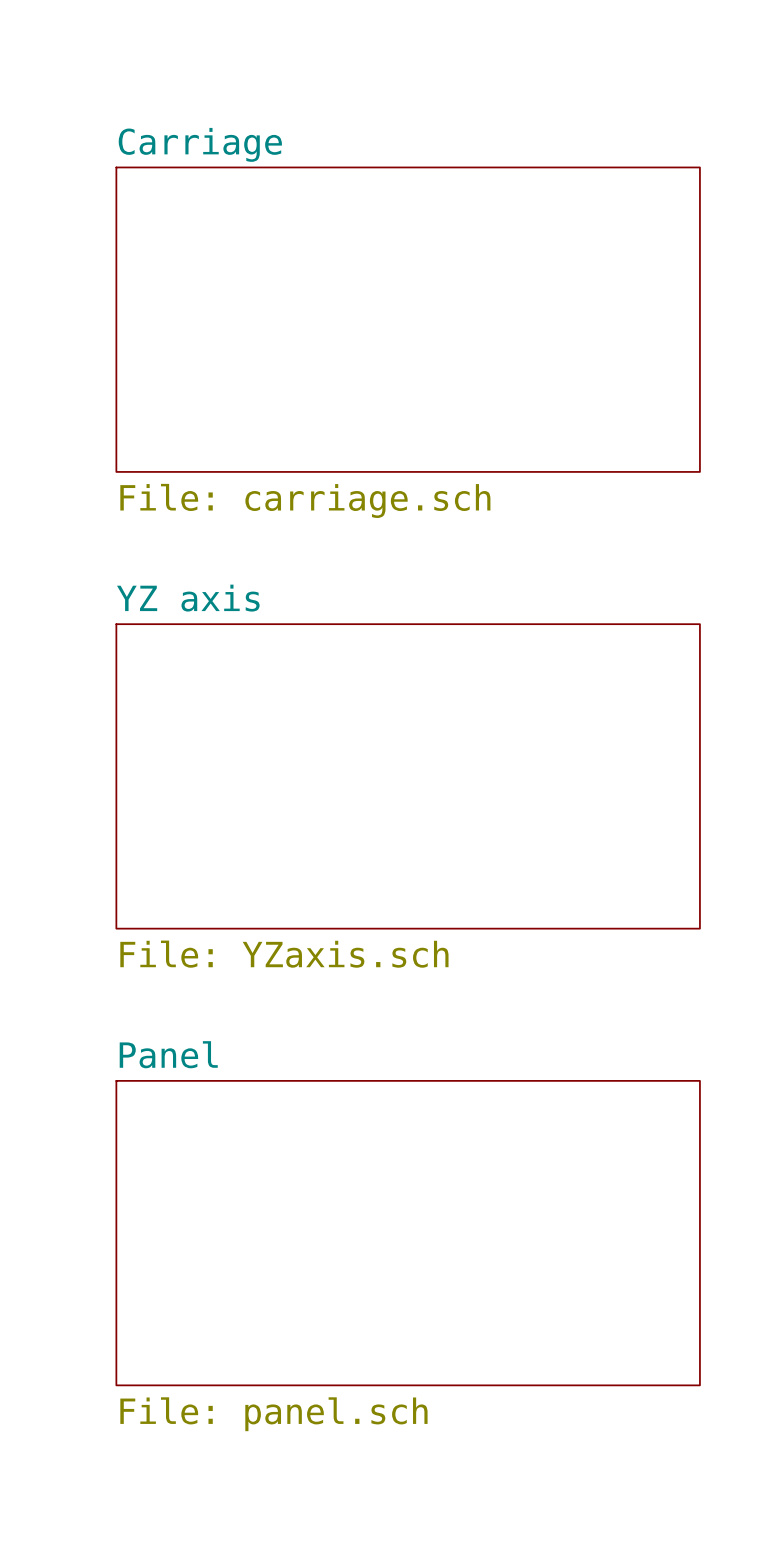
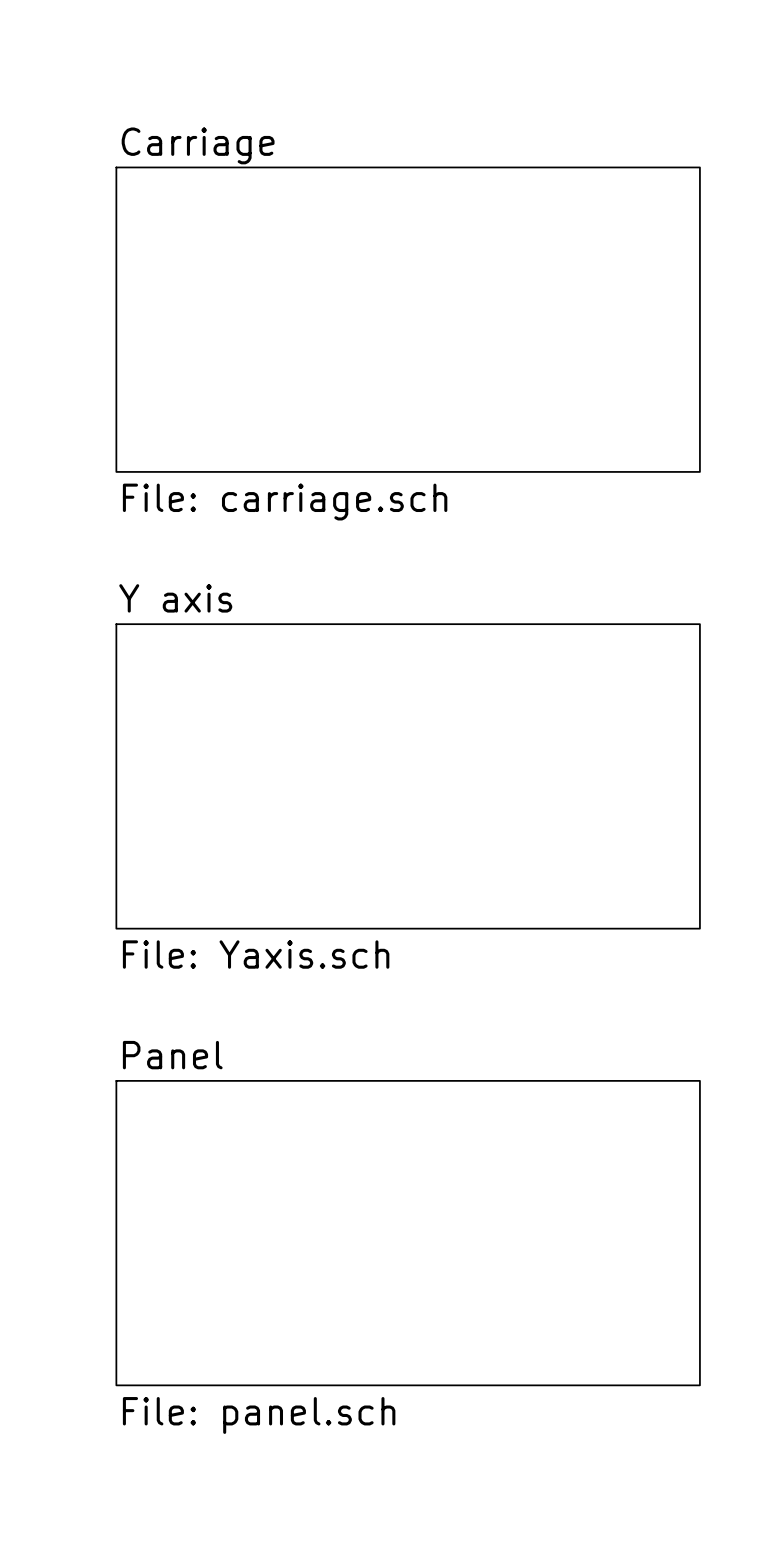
sheet YZ axis name: YZ axis (188, 598) -> Y axis (175, 598)
sheet YZ axis value: File: YZaxis.sch (284, 954) -> File: Yaxis.sch (256, 954)

